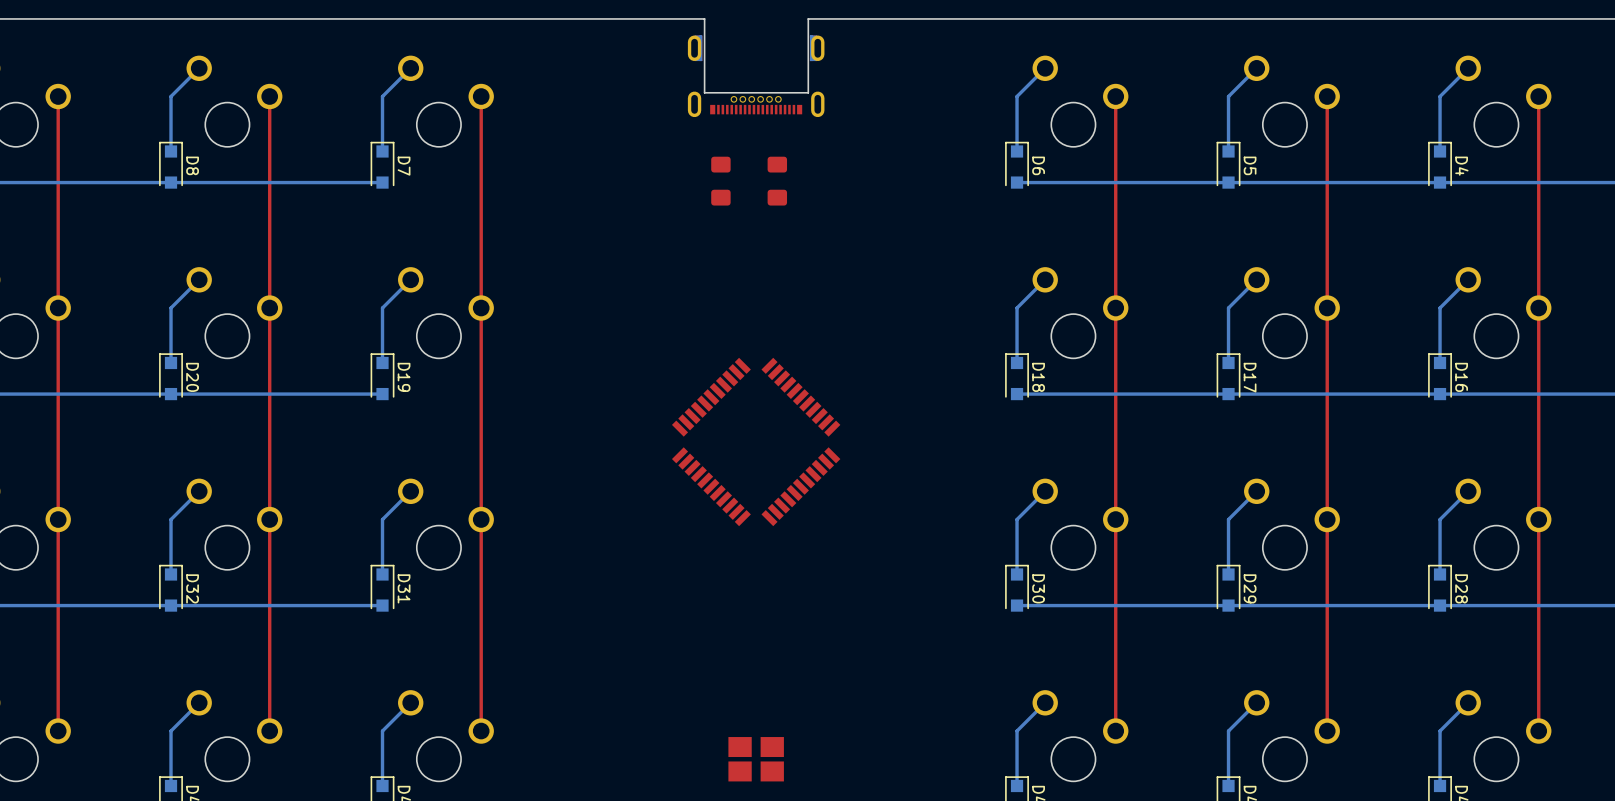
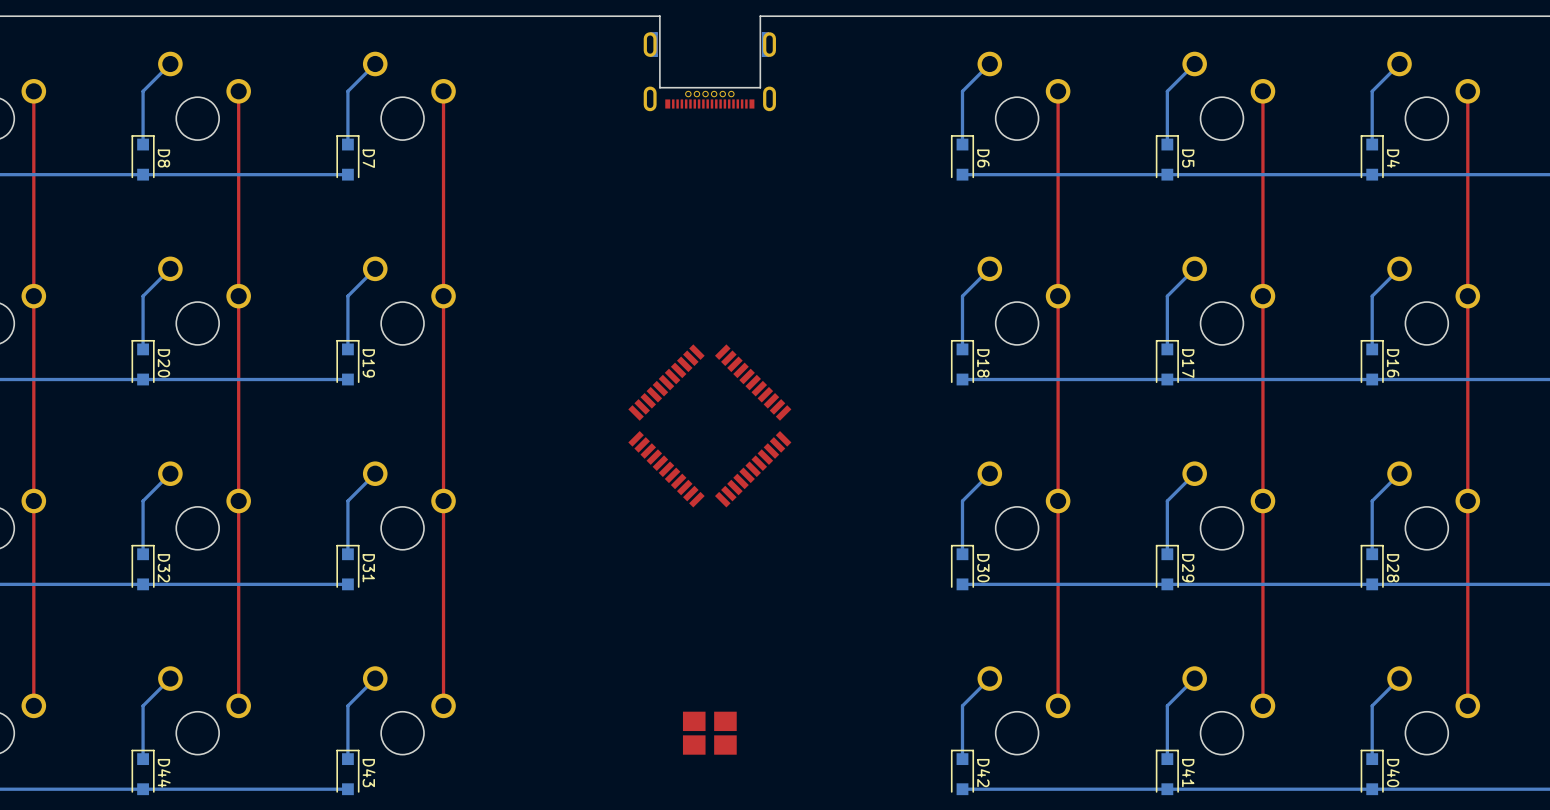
part: (720, 181) -> none
part: (777, 181) -> none

